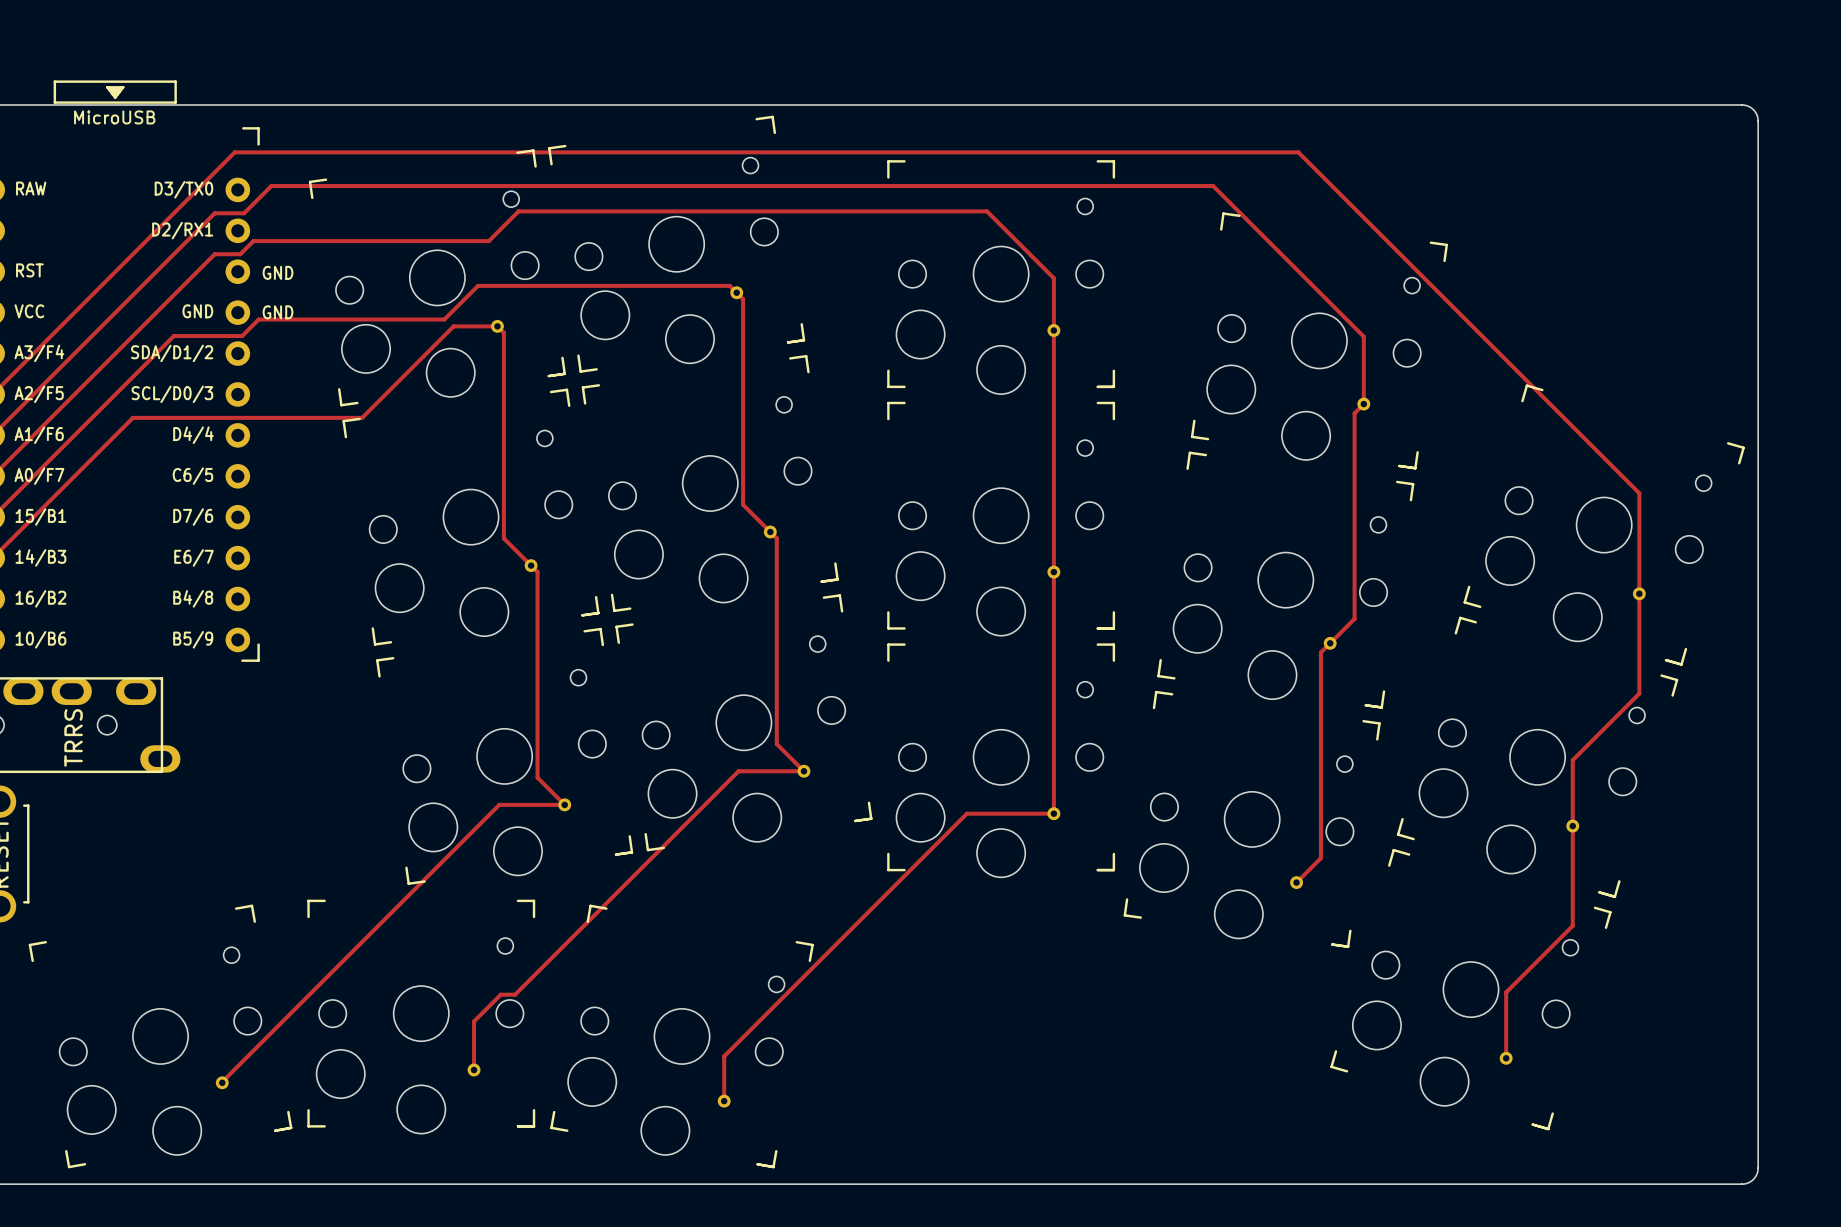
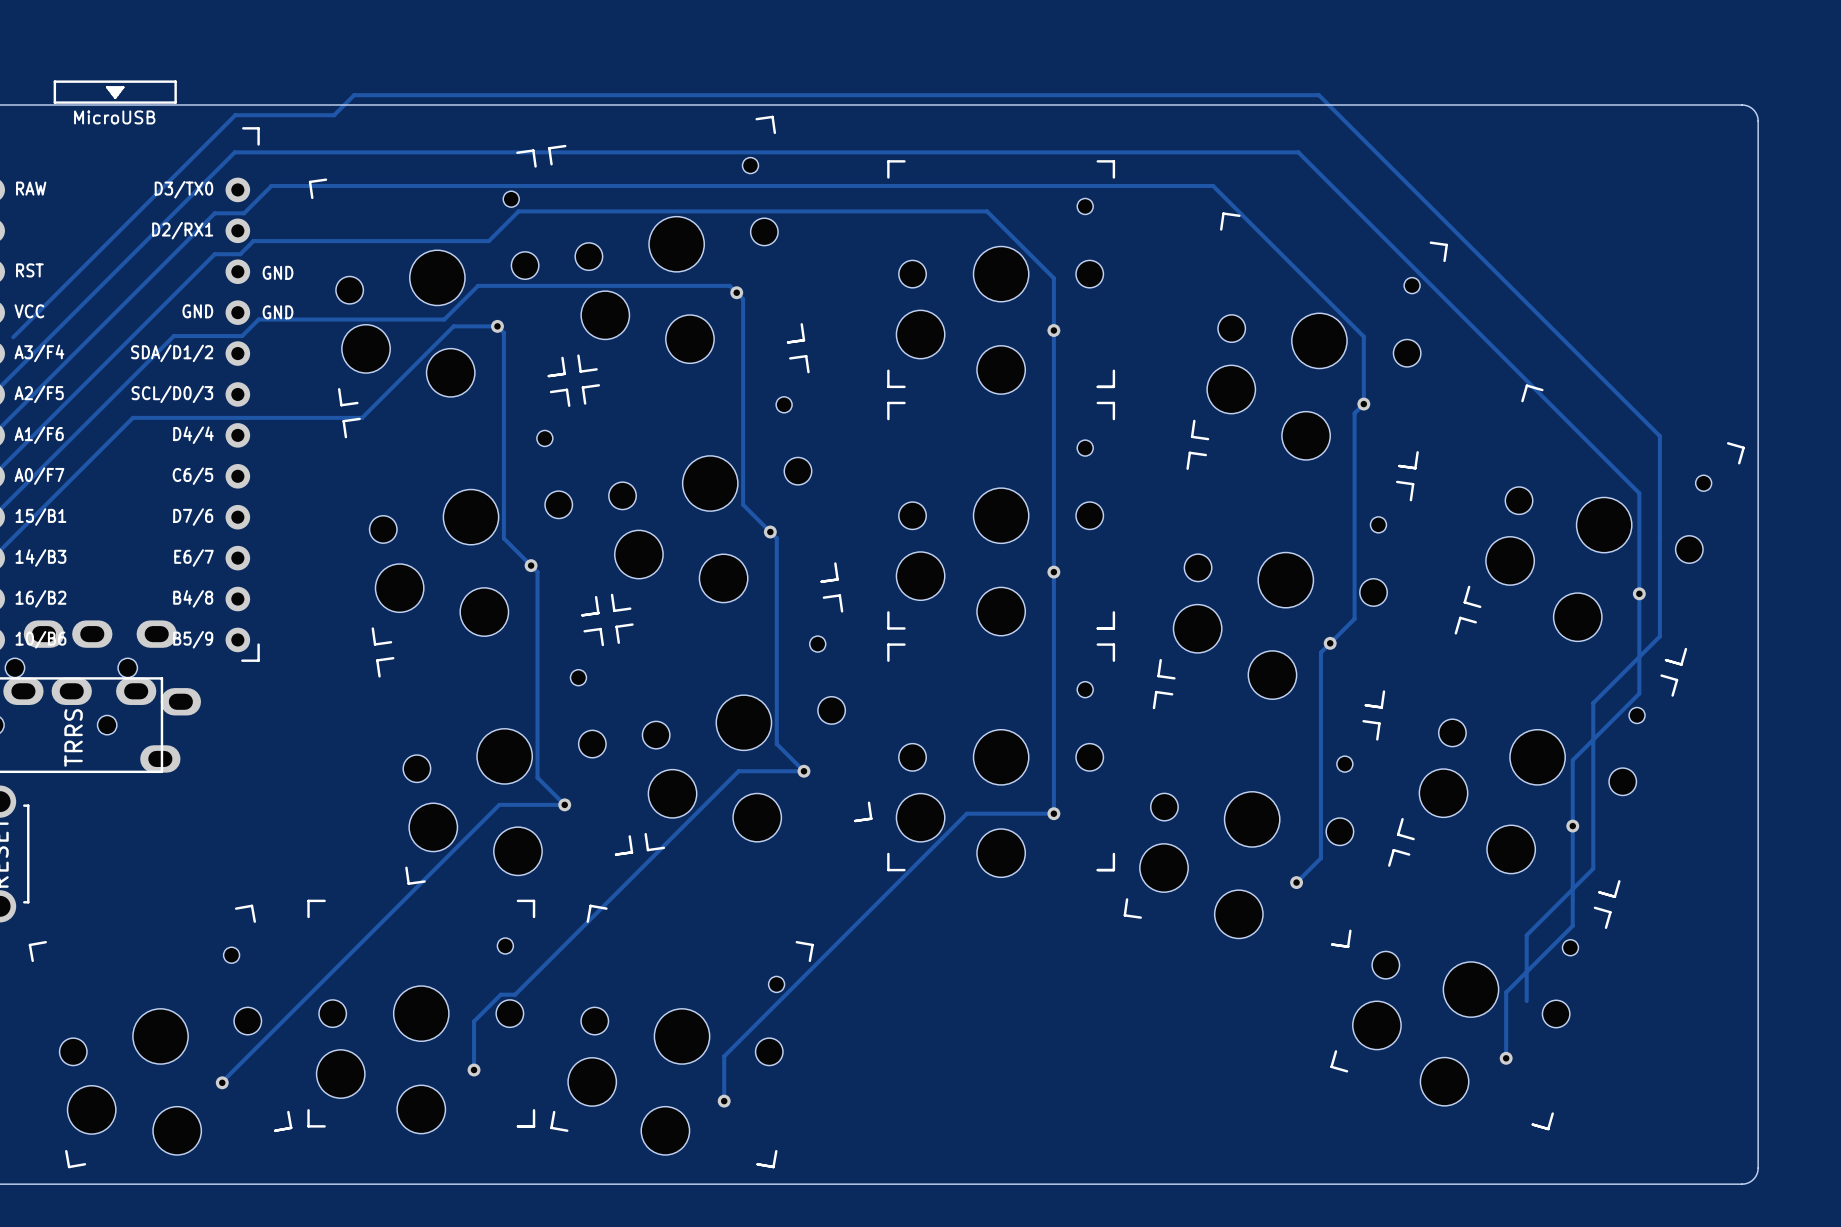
track: none -> (13, 337) (235, 115) (334, 115) (354, 95) (1318, 95) (1659, 436) (1659, 636) (1593, 703) (1593, 868) (1526, 935) (1526, 1001)
part: none -> (103, 667)

